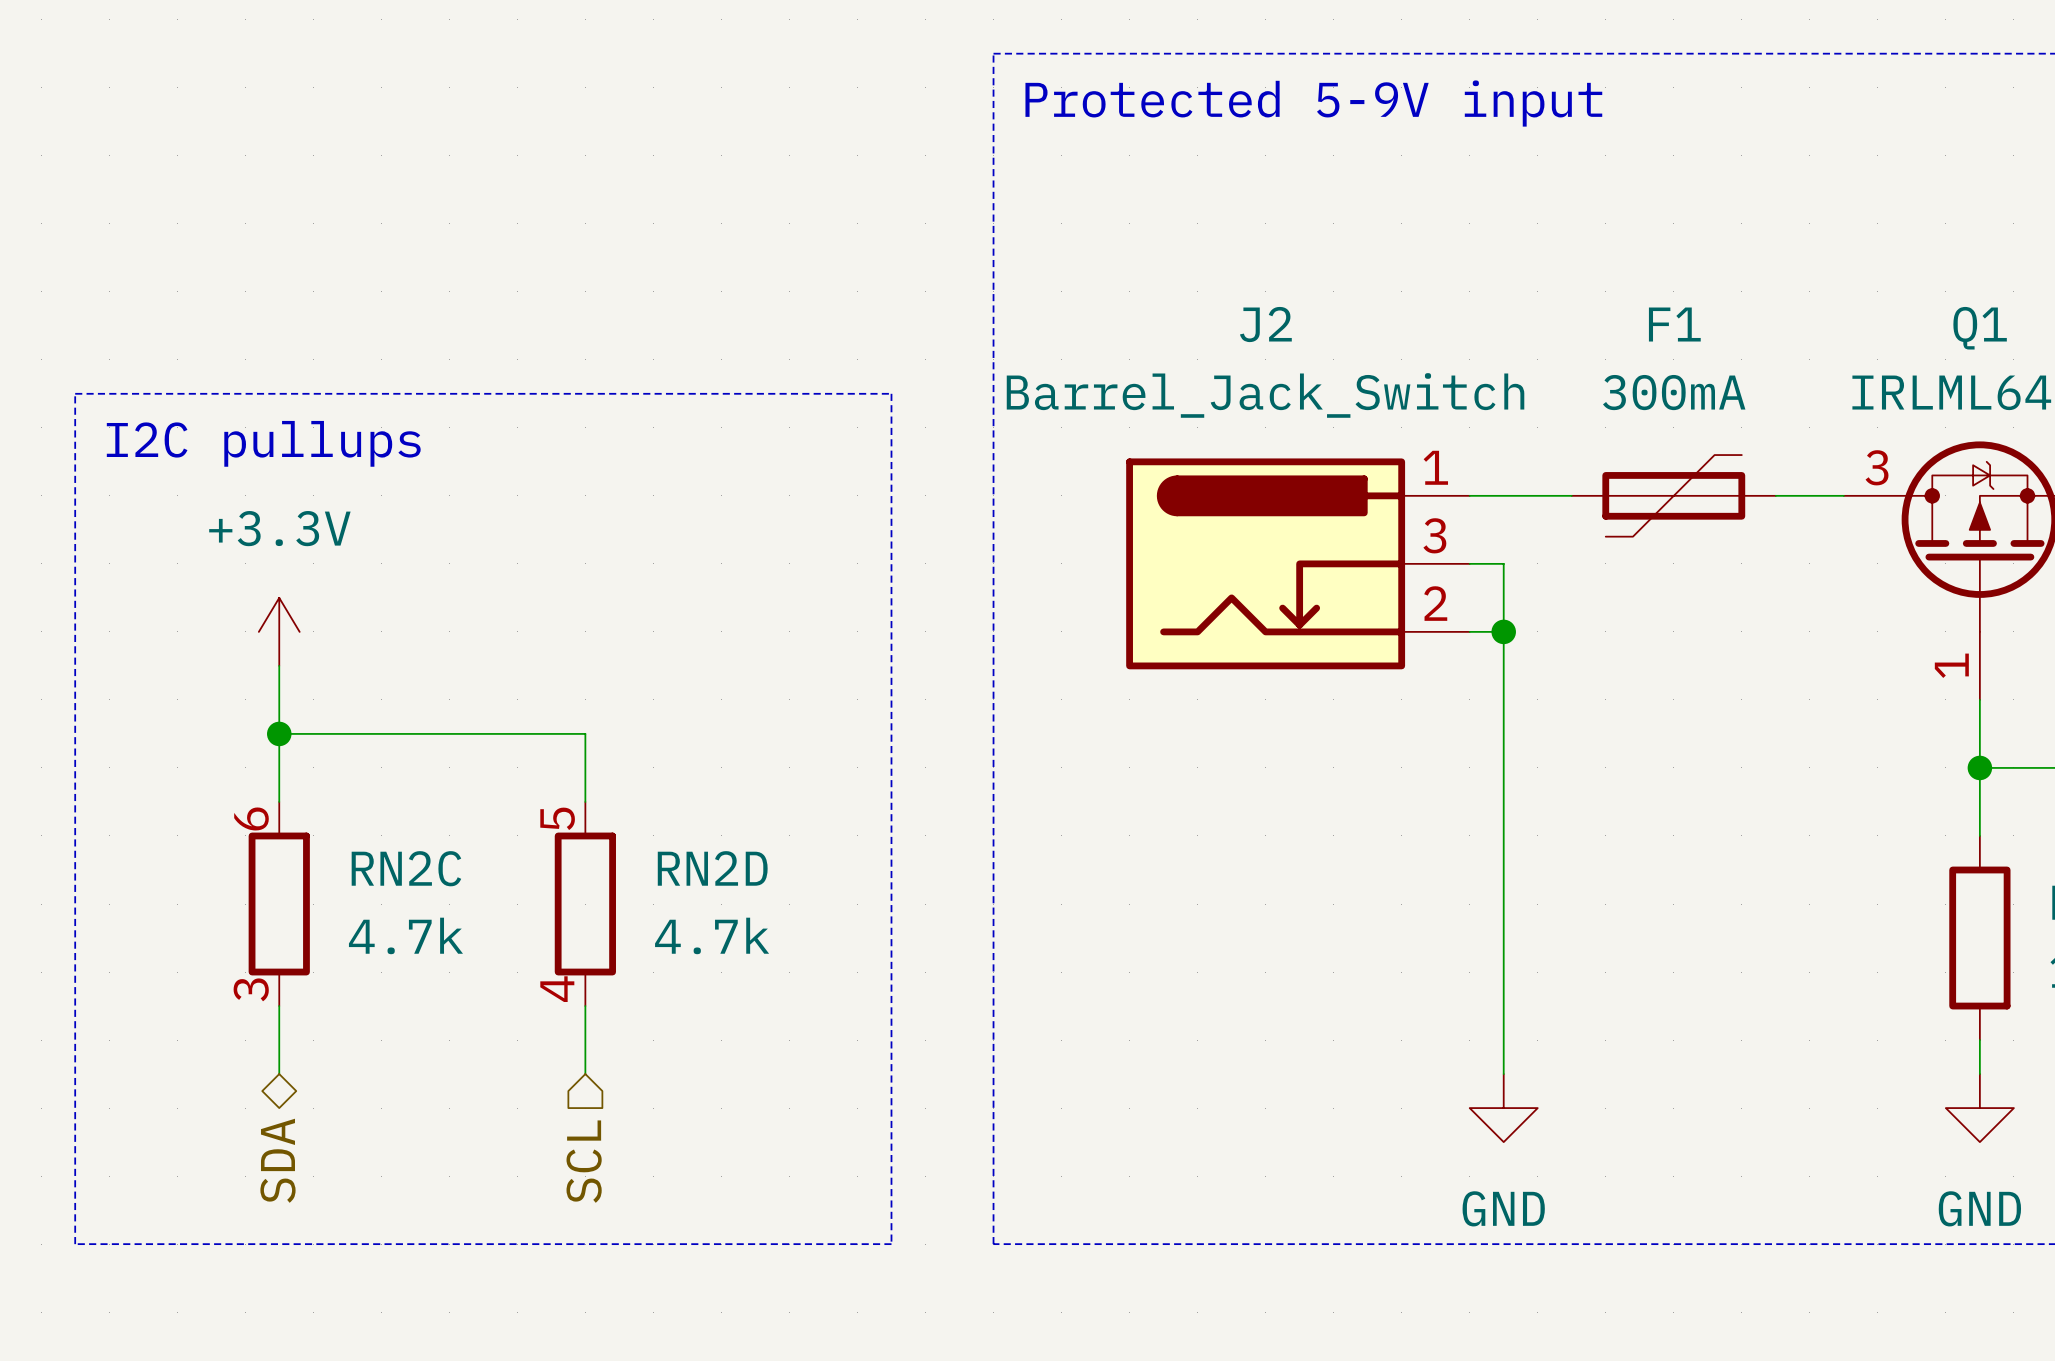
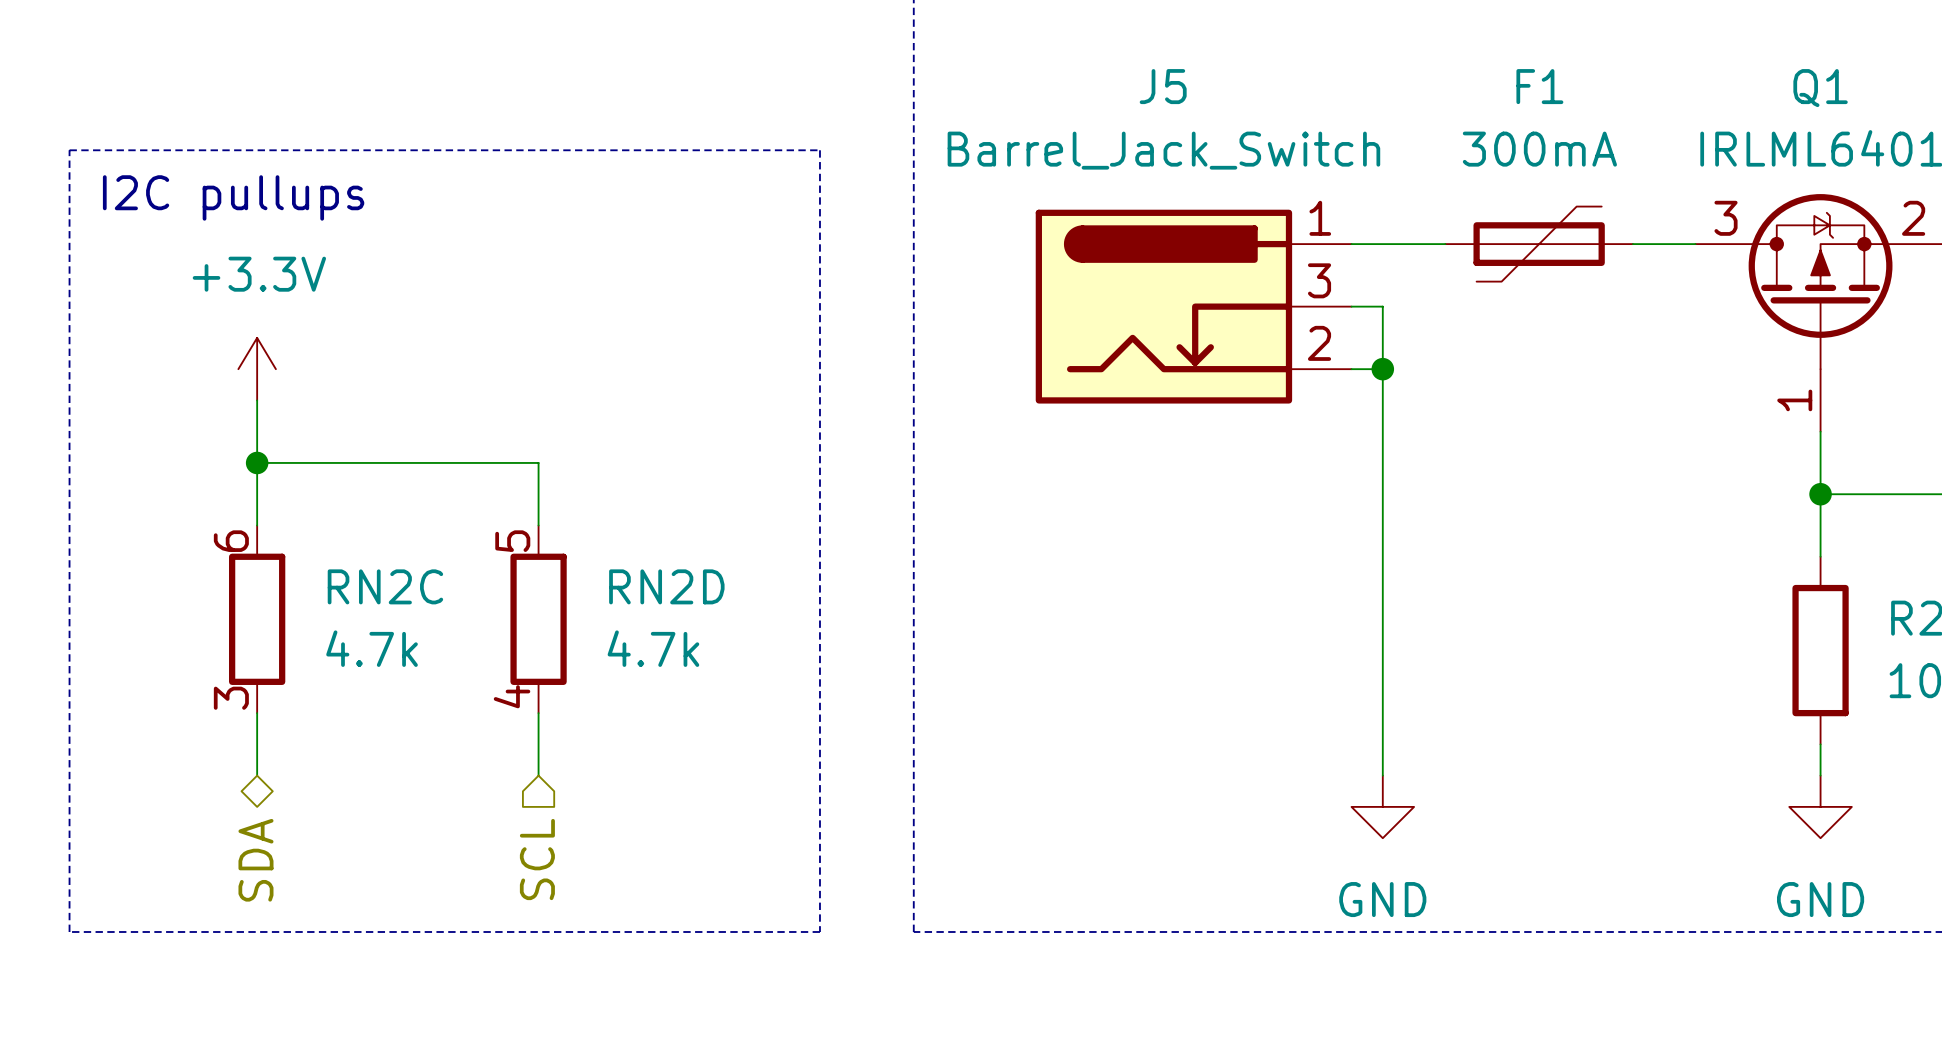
J2 name: J2 (1265, 324) -> J5 (1163, 86)

